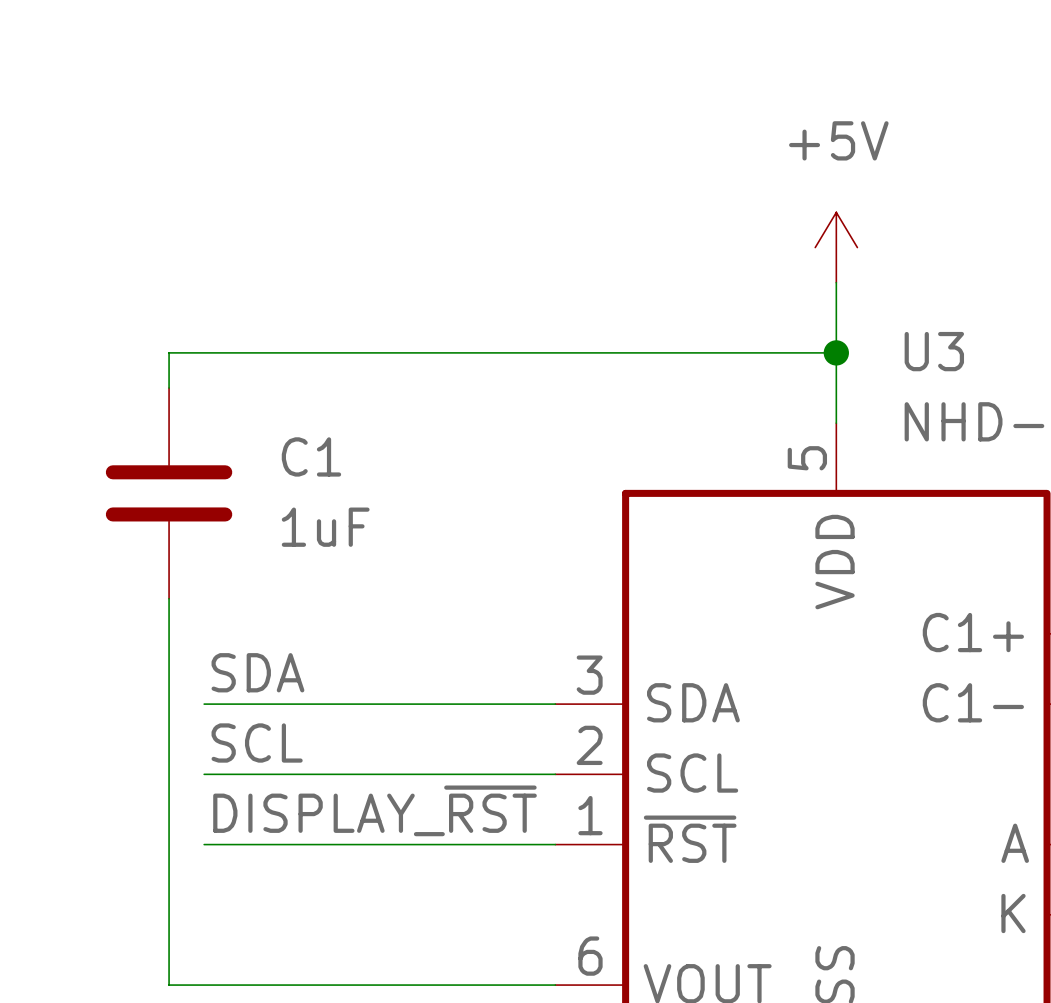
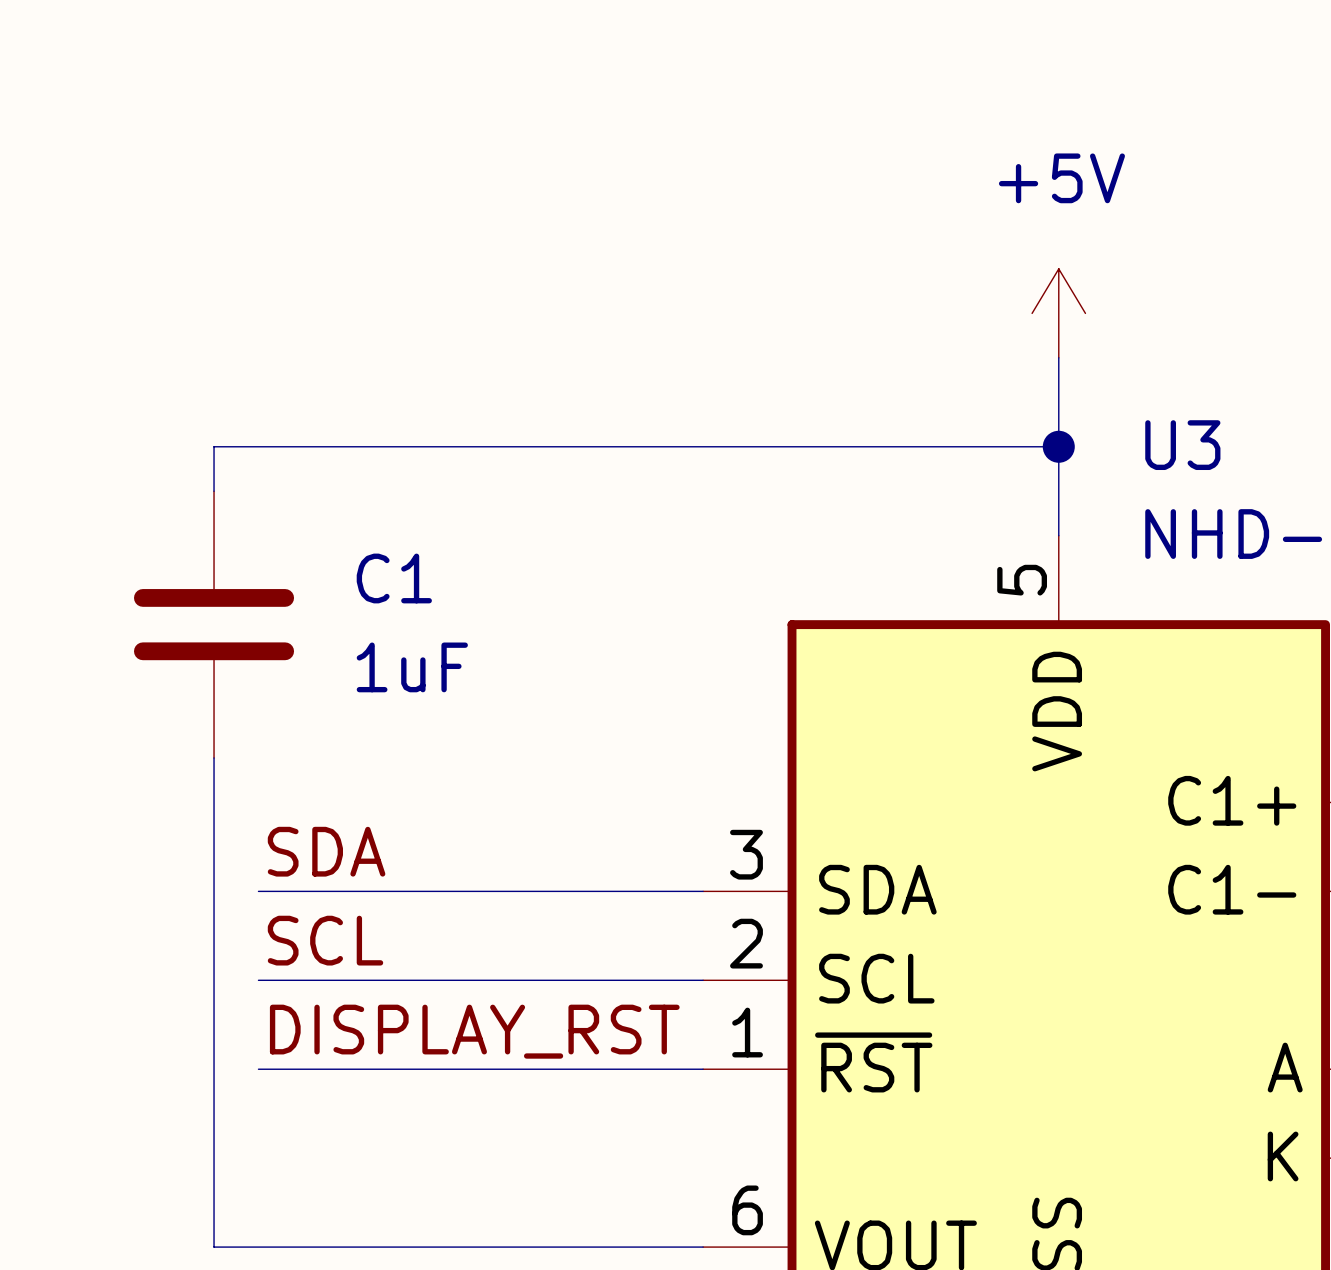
label: DISPLAY_~{RST} (375, 810) -> DISPLAY_RST (474, 1031)

